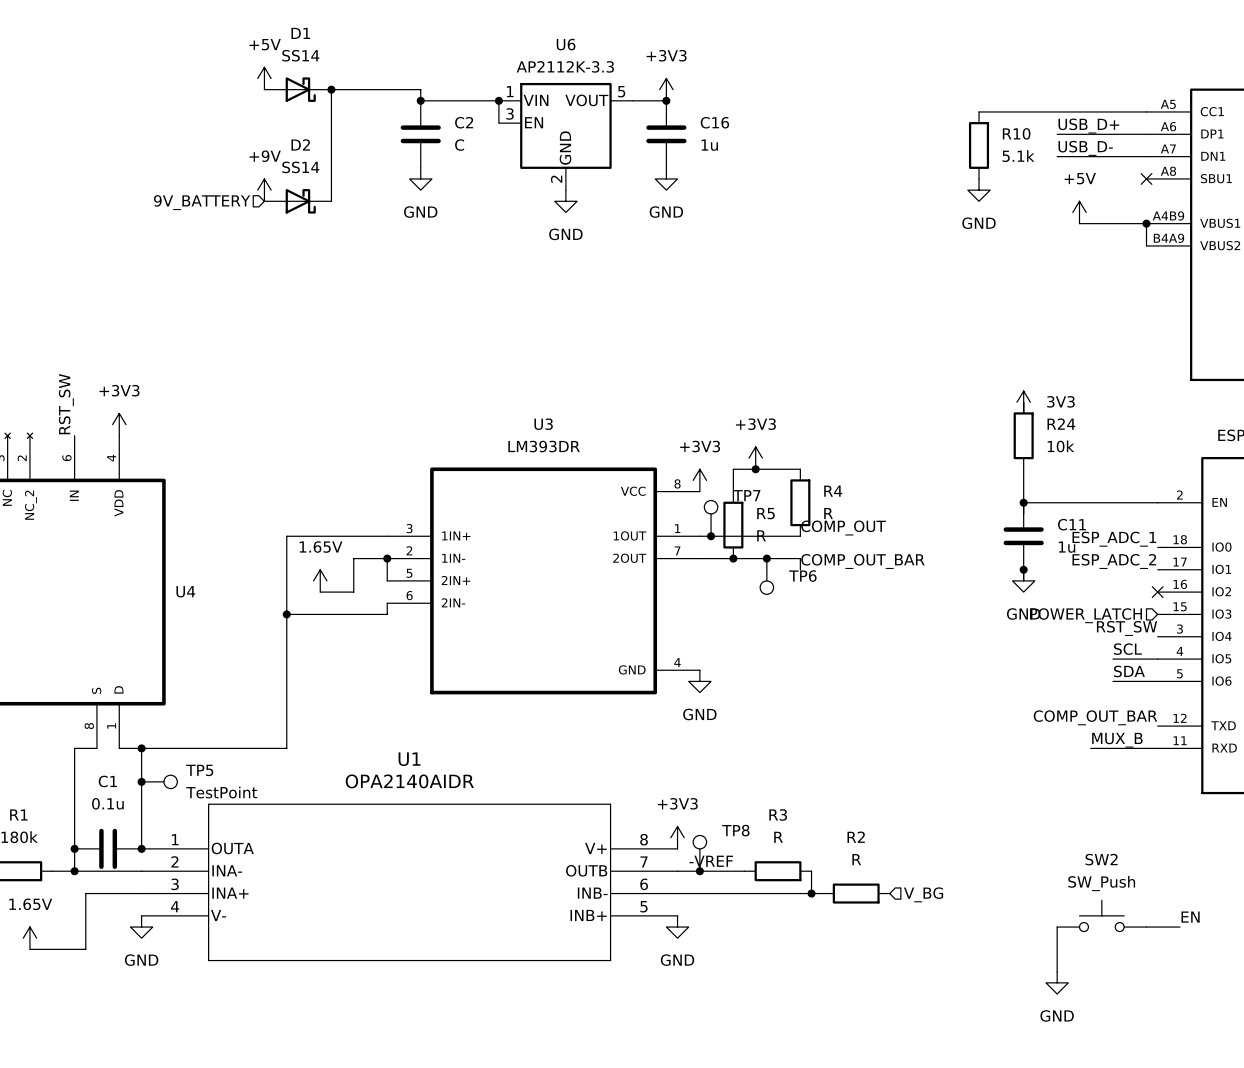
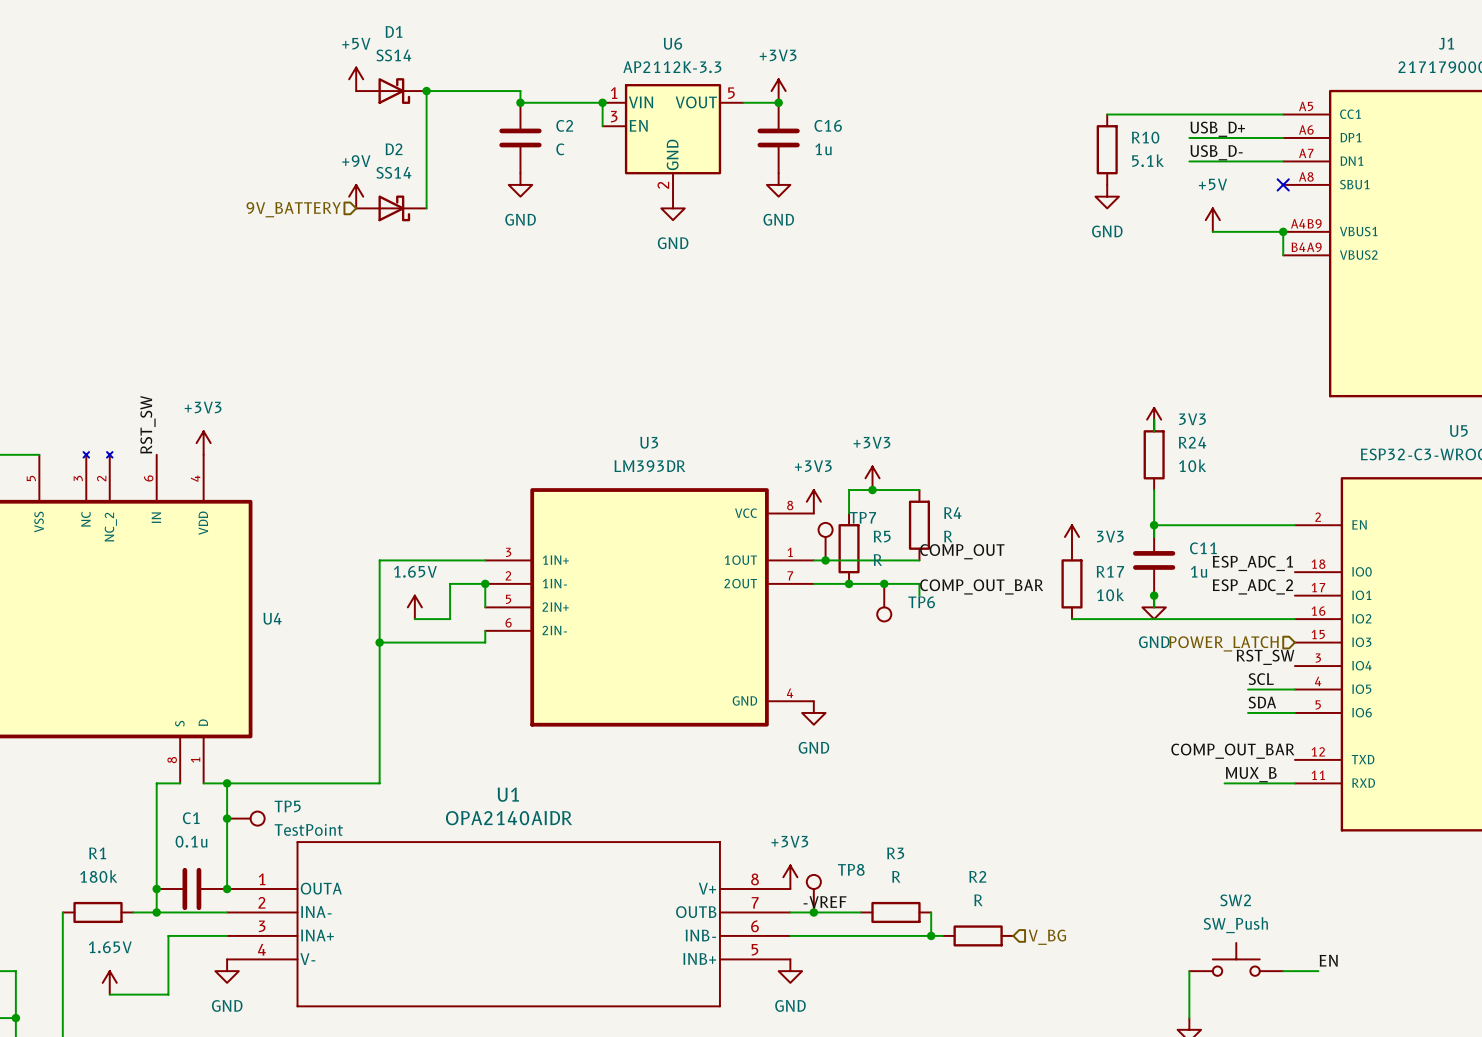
power symbol: none -> 3V3 (1072, 536)
R17: none -> 10k (1072, 583)
wire: none -> (1072, 619) (1294, 619)
no-connect mark: (1157, 592) -> none

